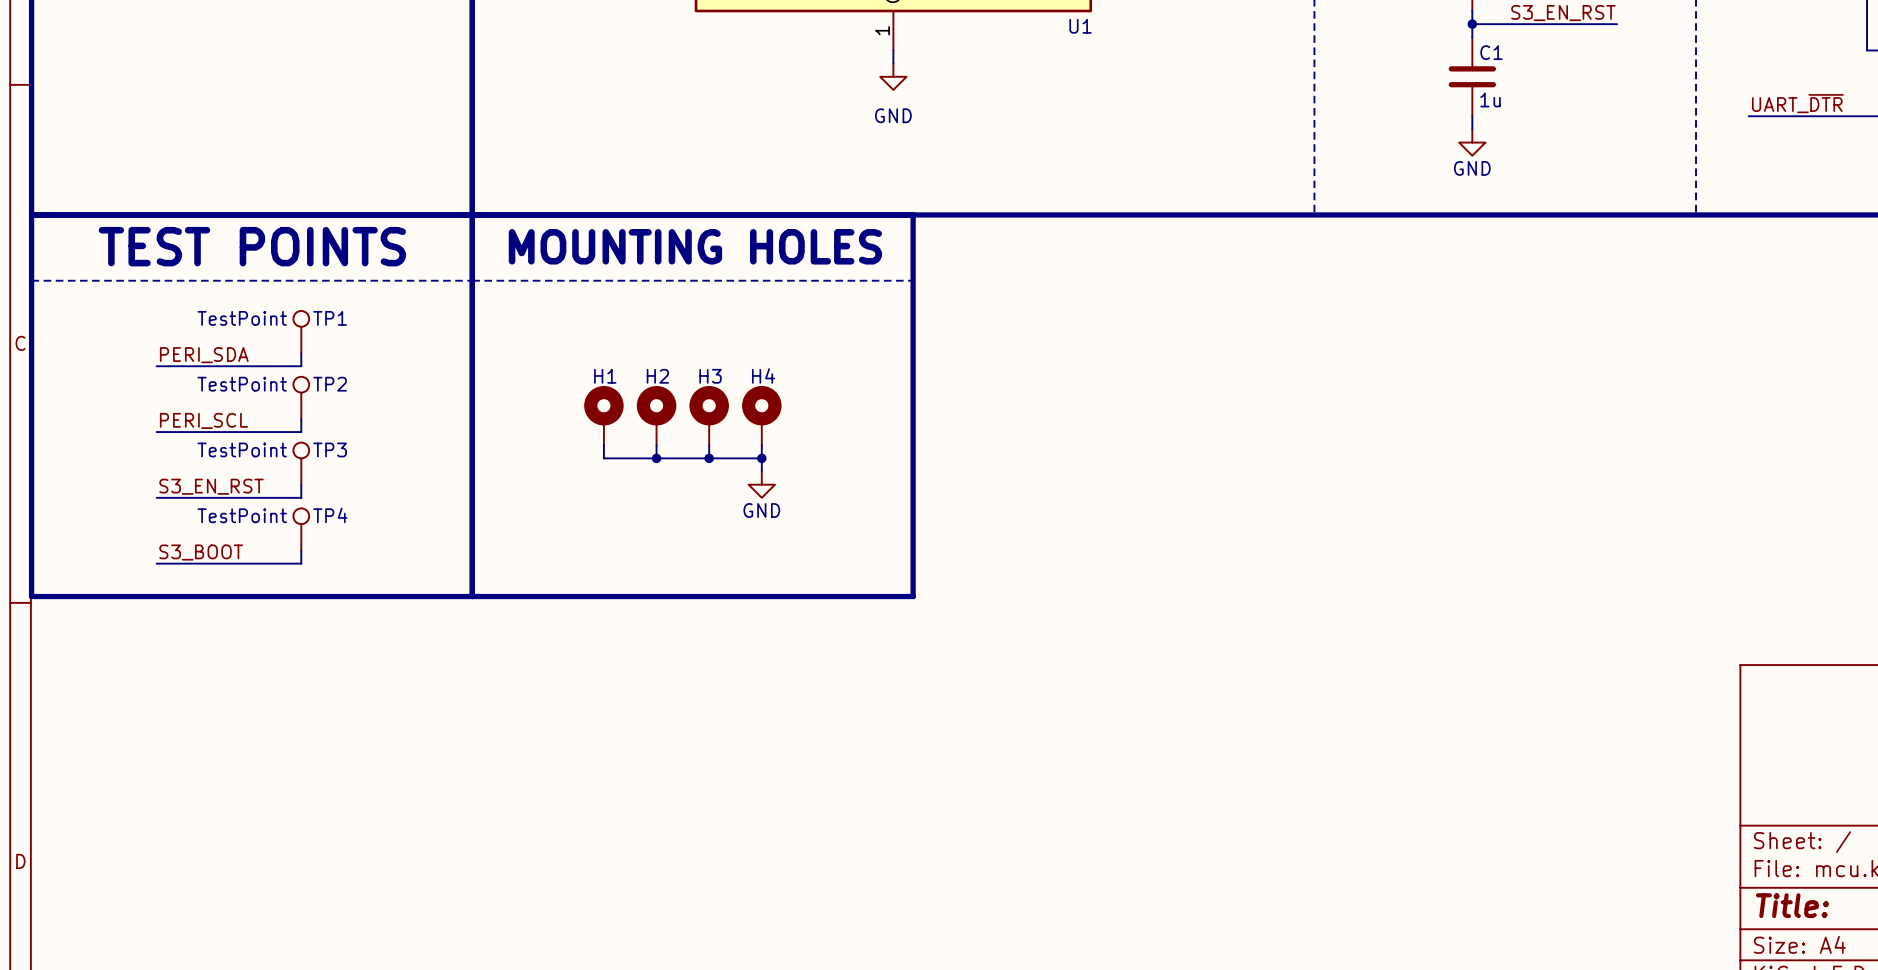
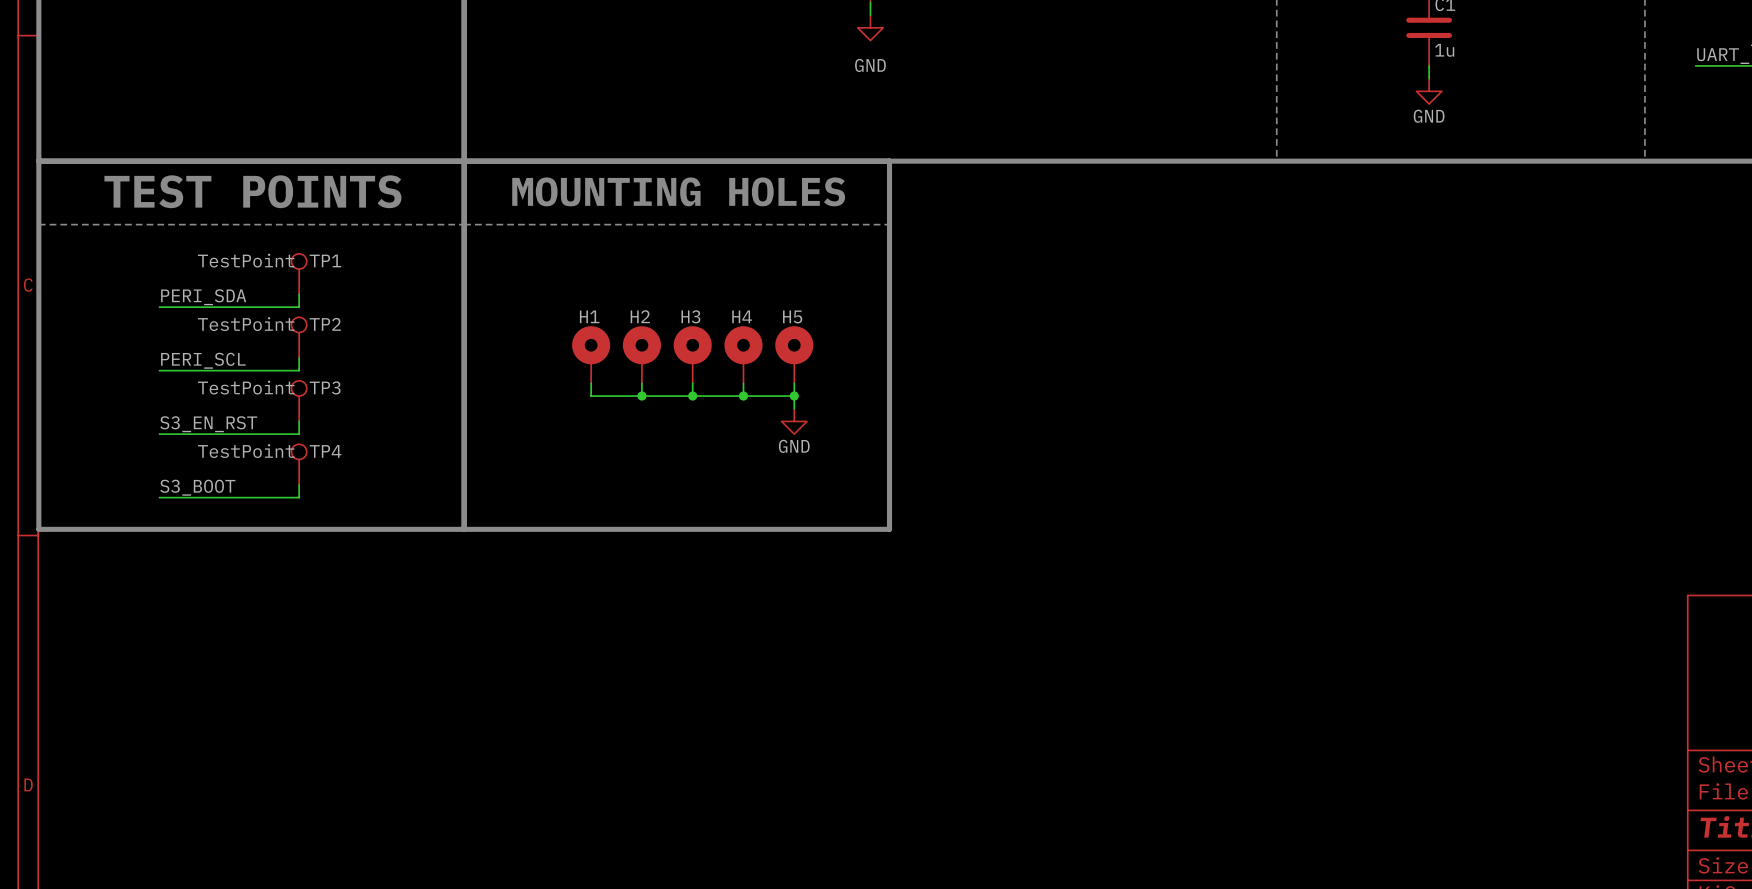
H5: none -> (794, 354)
wire: none -> (794, 383) (794, 408)
wire: (761, 458) (761, 471) -> (743, 396) (794, 396)
junction: none -> (794, 396)
power symbol position: GND (761, 484) -> GND (794, 421)

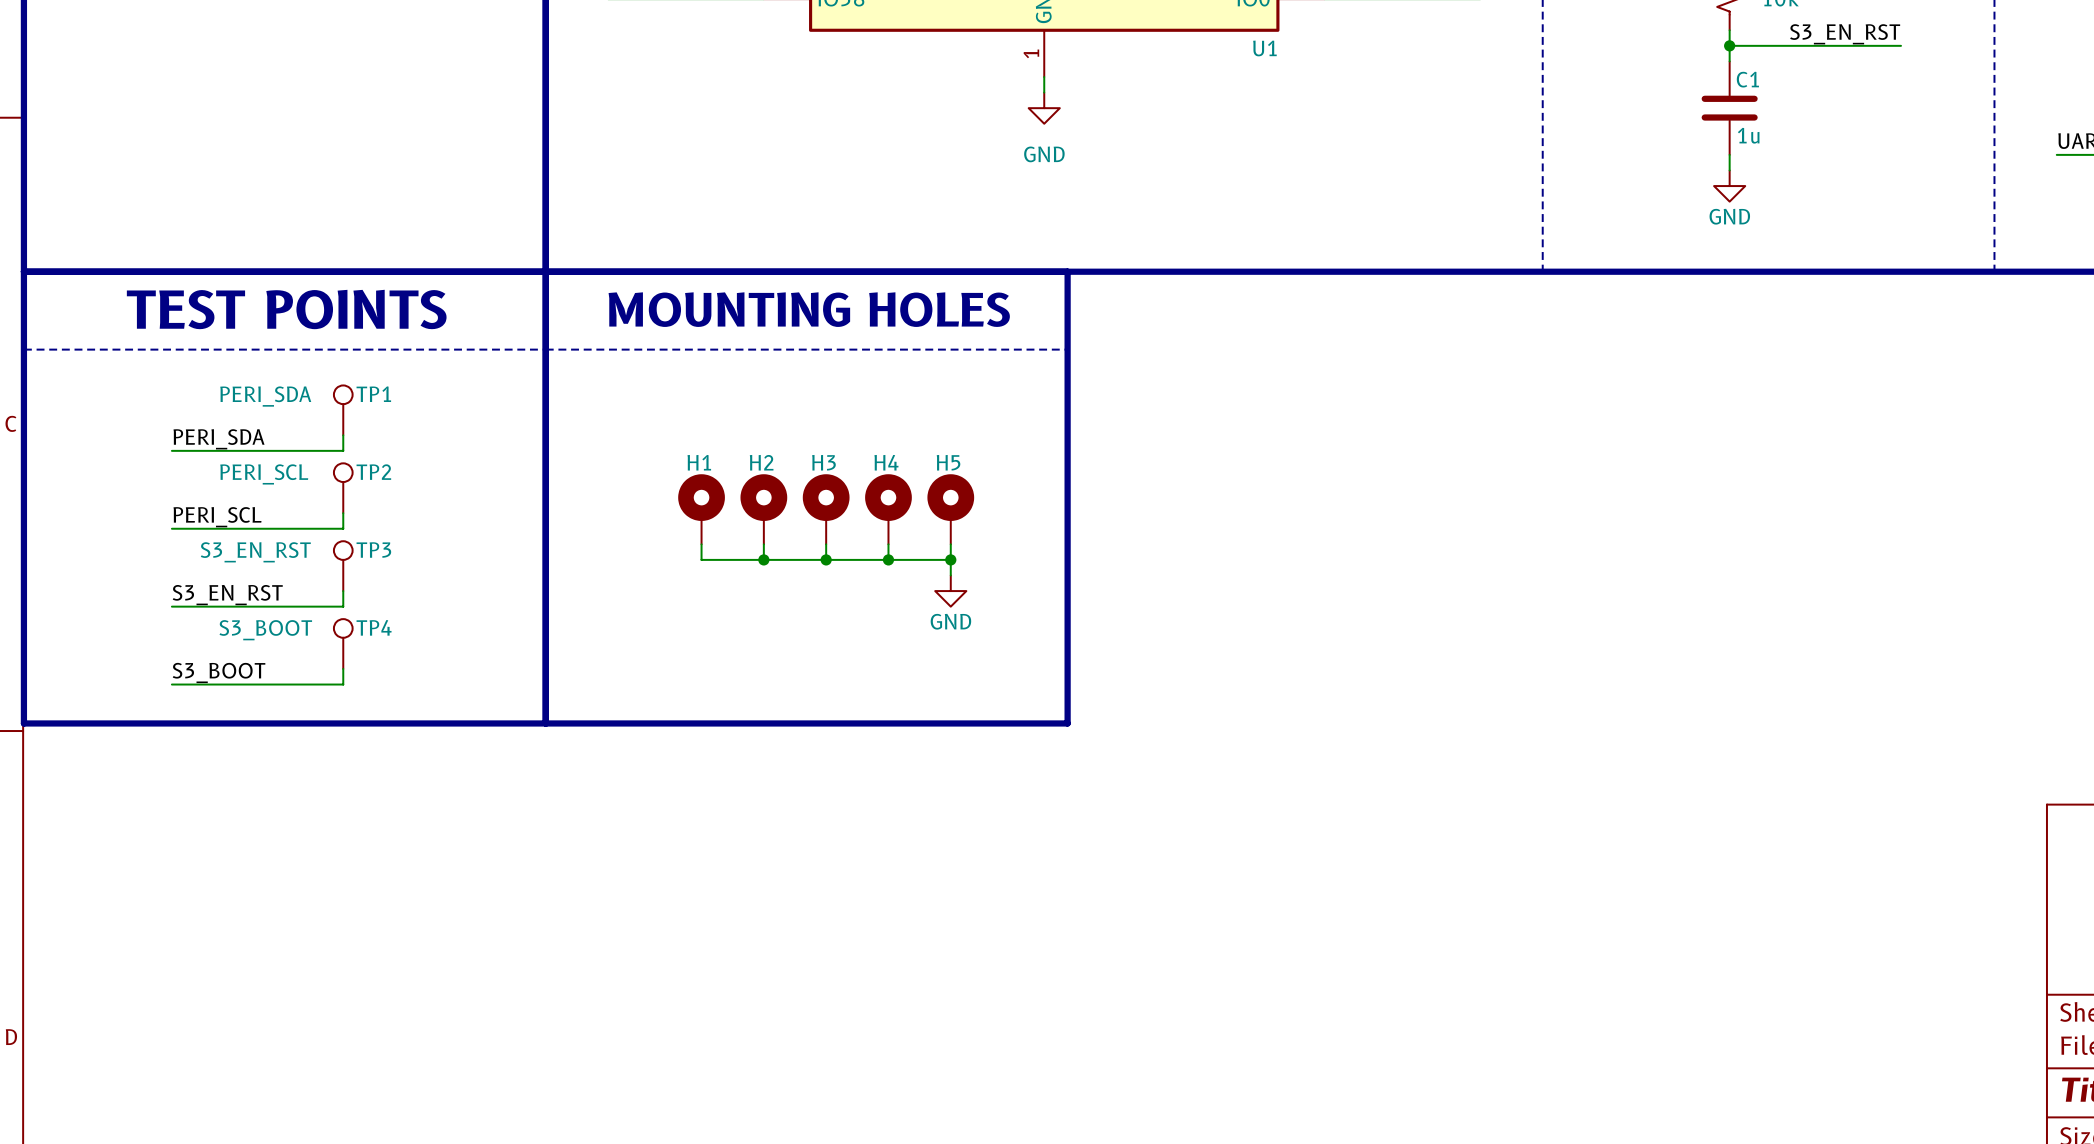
TP1 value: TestPoint (246, 260) -> PERI_SDA (265, 396)
TP2 value: TestPoint (246, 324) -> PERI_SCL (264, 474)
TP3 value: TestPoint (246, 387) -> S3_EN_RST (255, 552)
TP4 value: TestPoint (246, 451) -> S3_BOOT (265, 630)

